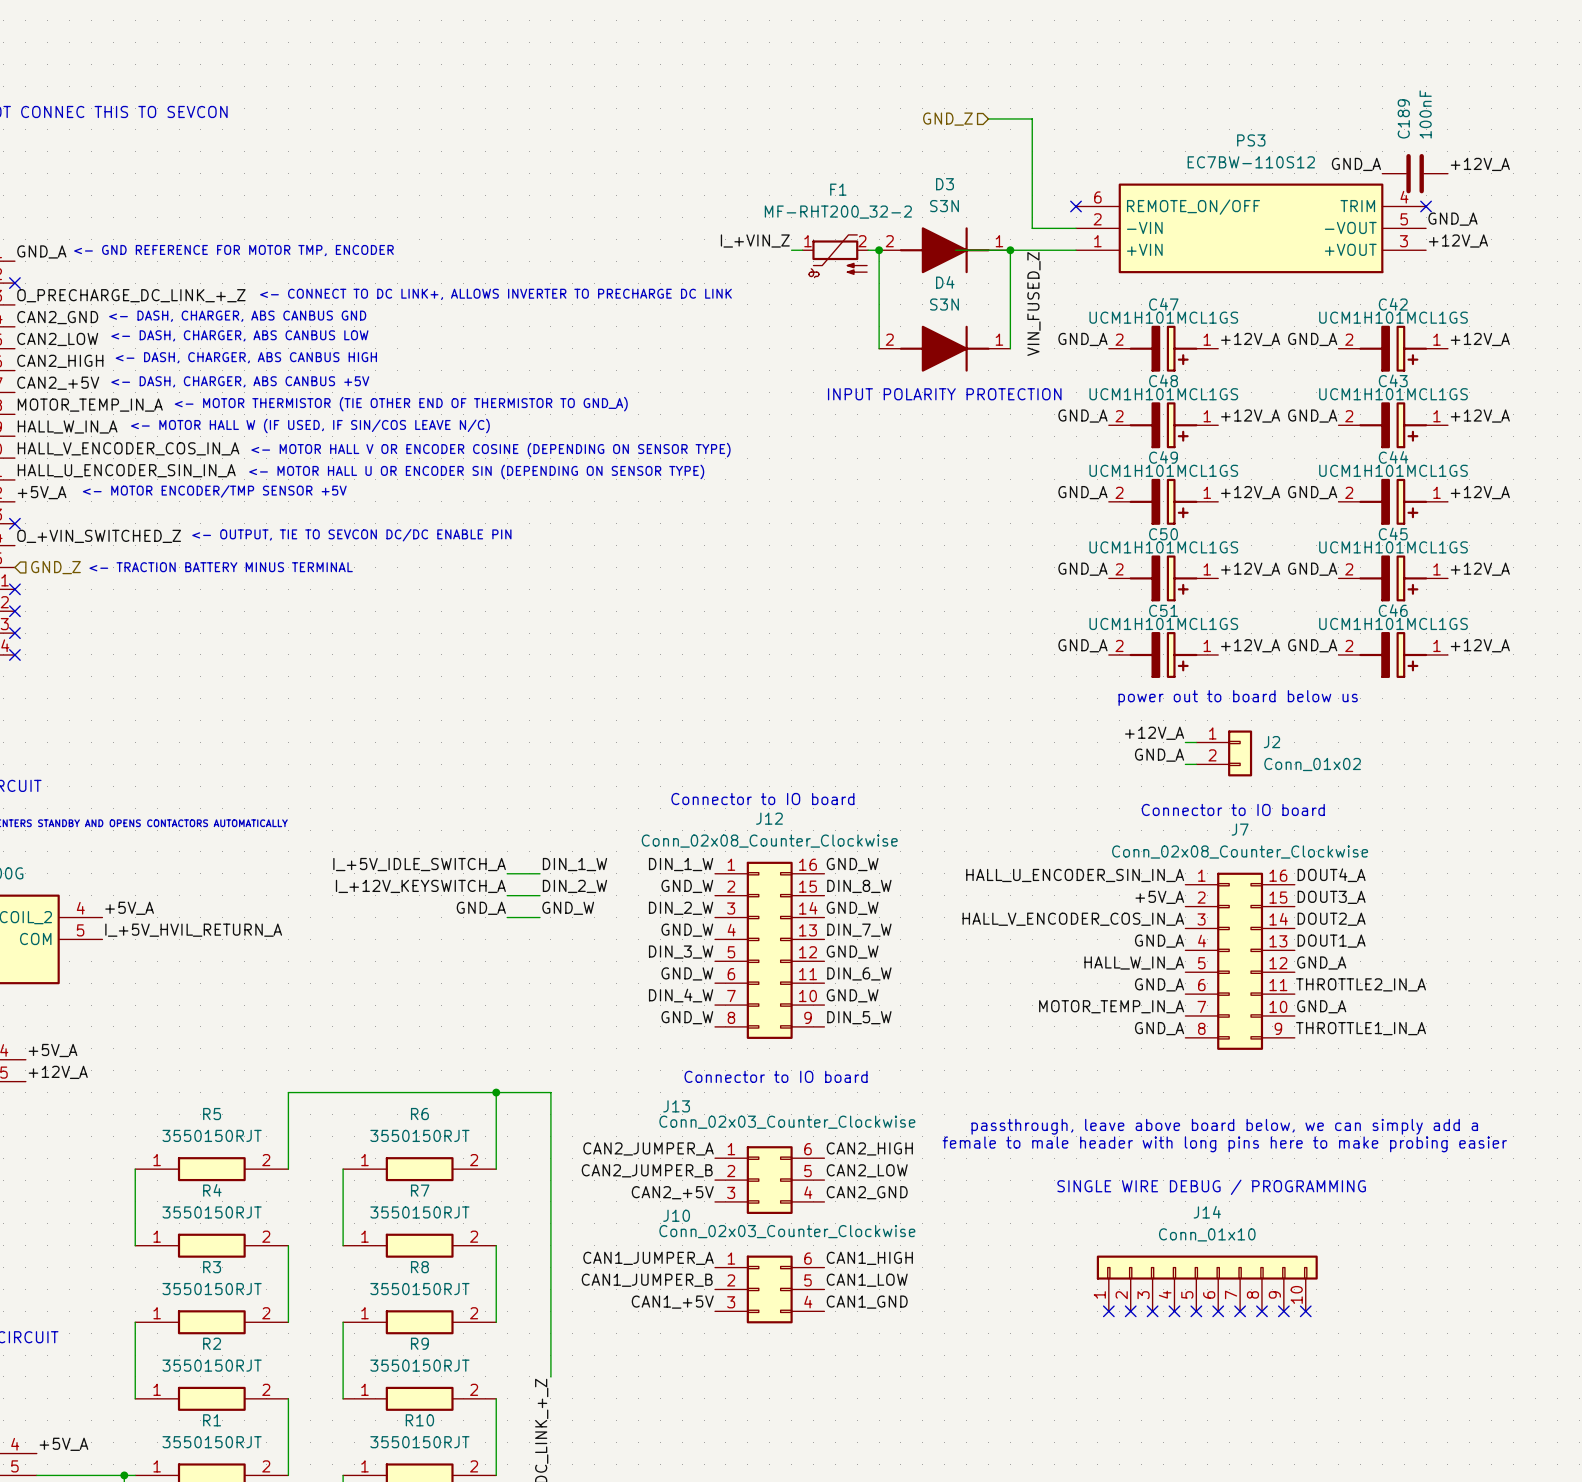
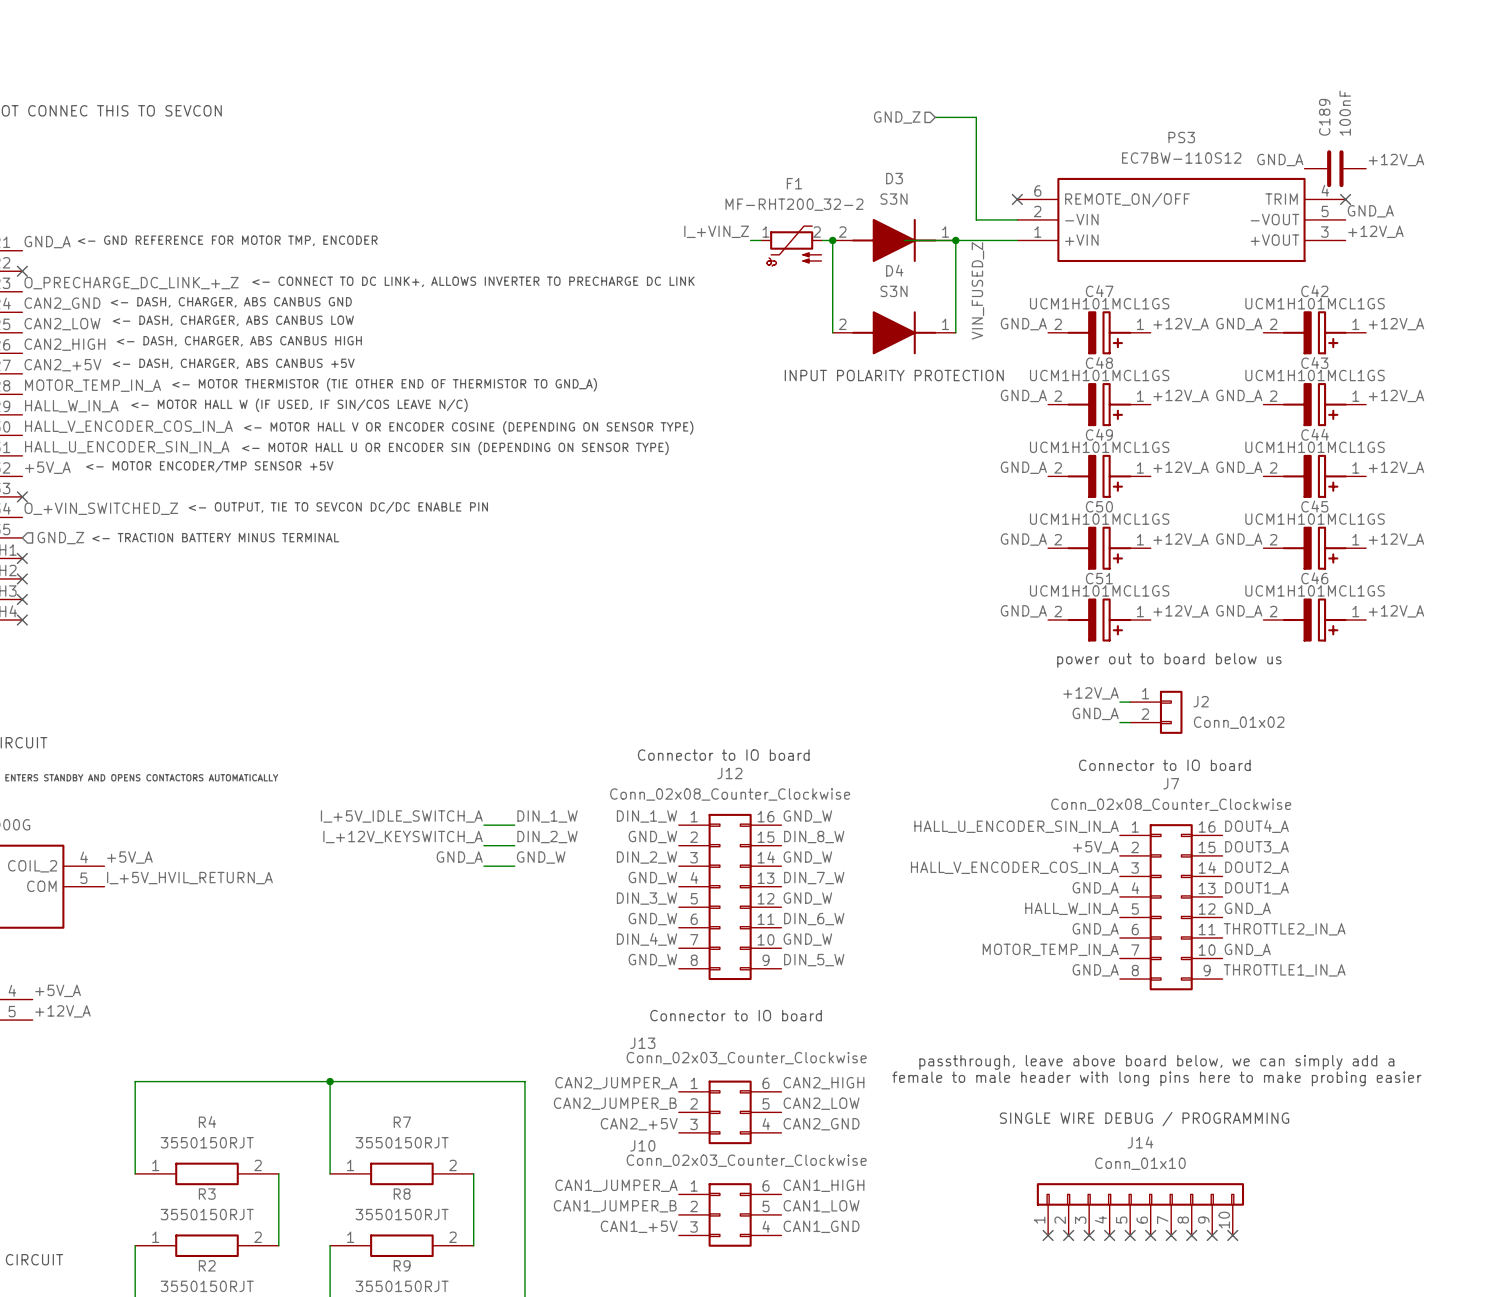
wire: (496, 1092) (496, 1169) -> none
junction: (496, 1092) -> none
wire: none -> (330, 1081) (330, 1102)
junction: none -> (330, 1081)
wire: (550, 1147) (550, 1092) (288, 1092) (288, 1169) -> (524, 1081) (135, 1081) (135, 1102)
R5: 3550150RJT (211, 1169) -> none
R6: 3550150RJT (419, 1169) -> none

